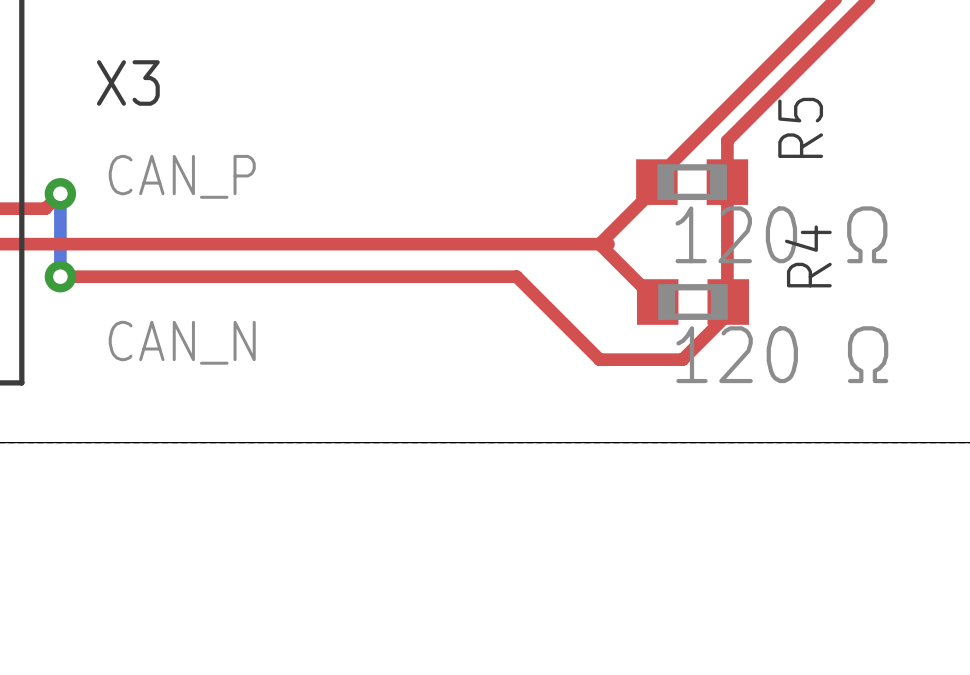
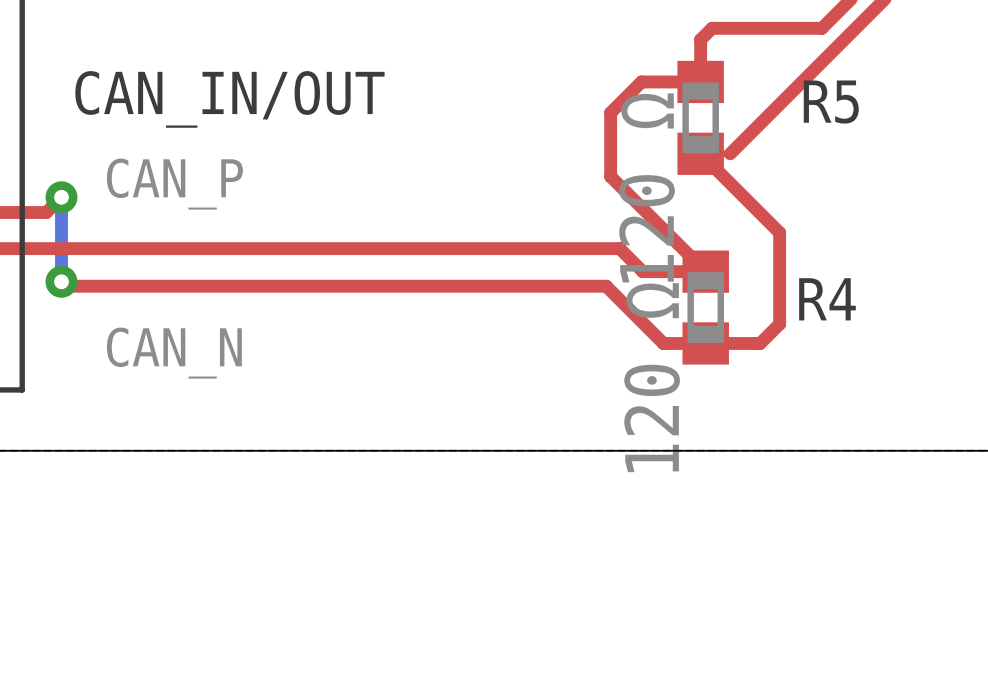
top track: (807, 27) (656, 177) (656, 186) (599, 244) (657, 302) -> (821, 28) (712, 28) (700, 39) (700, 81)
top track: none -> (700, 81) (641, 81) (610, 112) (610, 176) (705, 271) (642, 271) (619, 248)
X3 name: X3 (128, 82) -> CAN_IN/OUT (229, 99)
top track: (727, 140) (727, 314) (682, 359) (599, 359) (516, 276) (60, 276) -> (740, 143) (730, 153) (700, 153) (779, 232) (779, 324) (760, 343) (663, 343) (606, 286) (65, 286)
R5 rotation: 0° (692, 182) -> 90° clockwise (700, 117)
R4 rotation: 0° (692, 302) -> 90° clockwise (705, 307)

